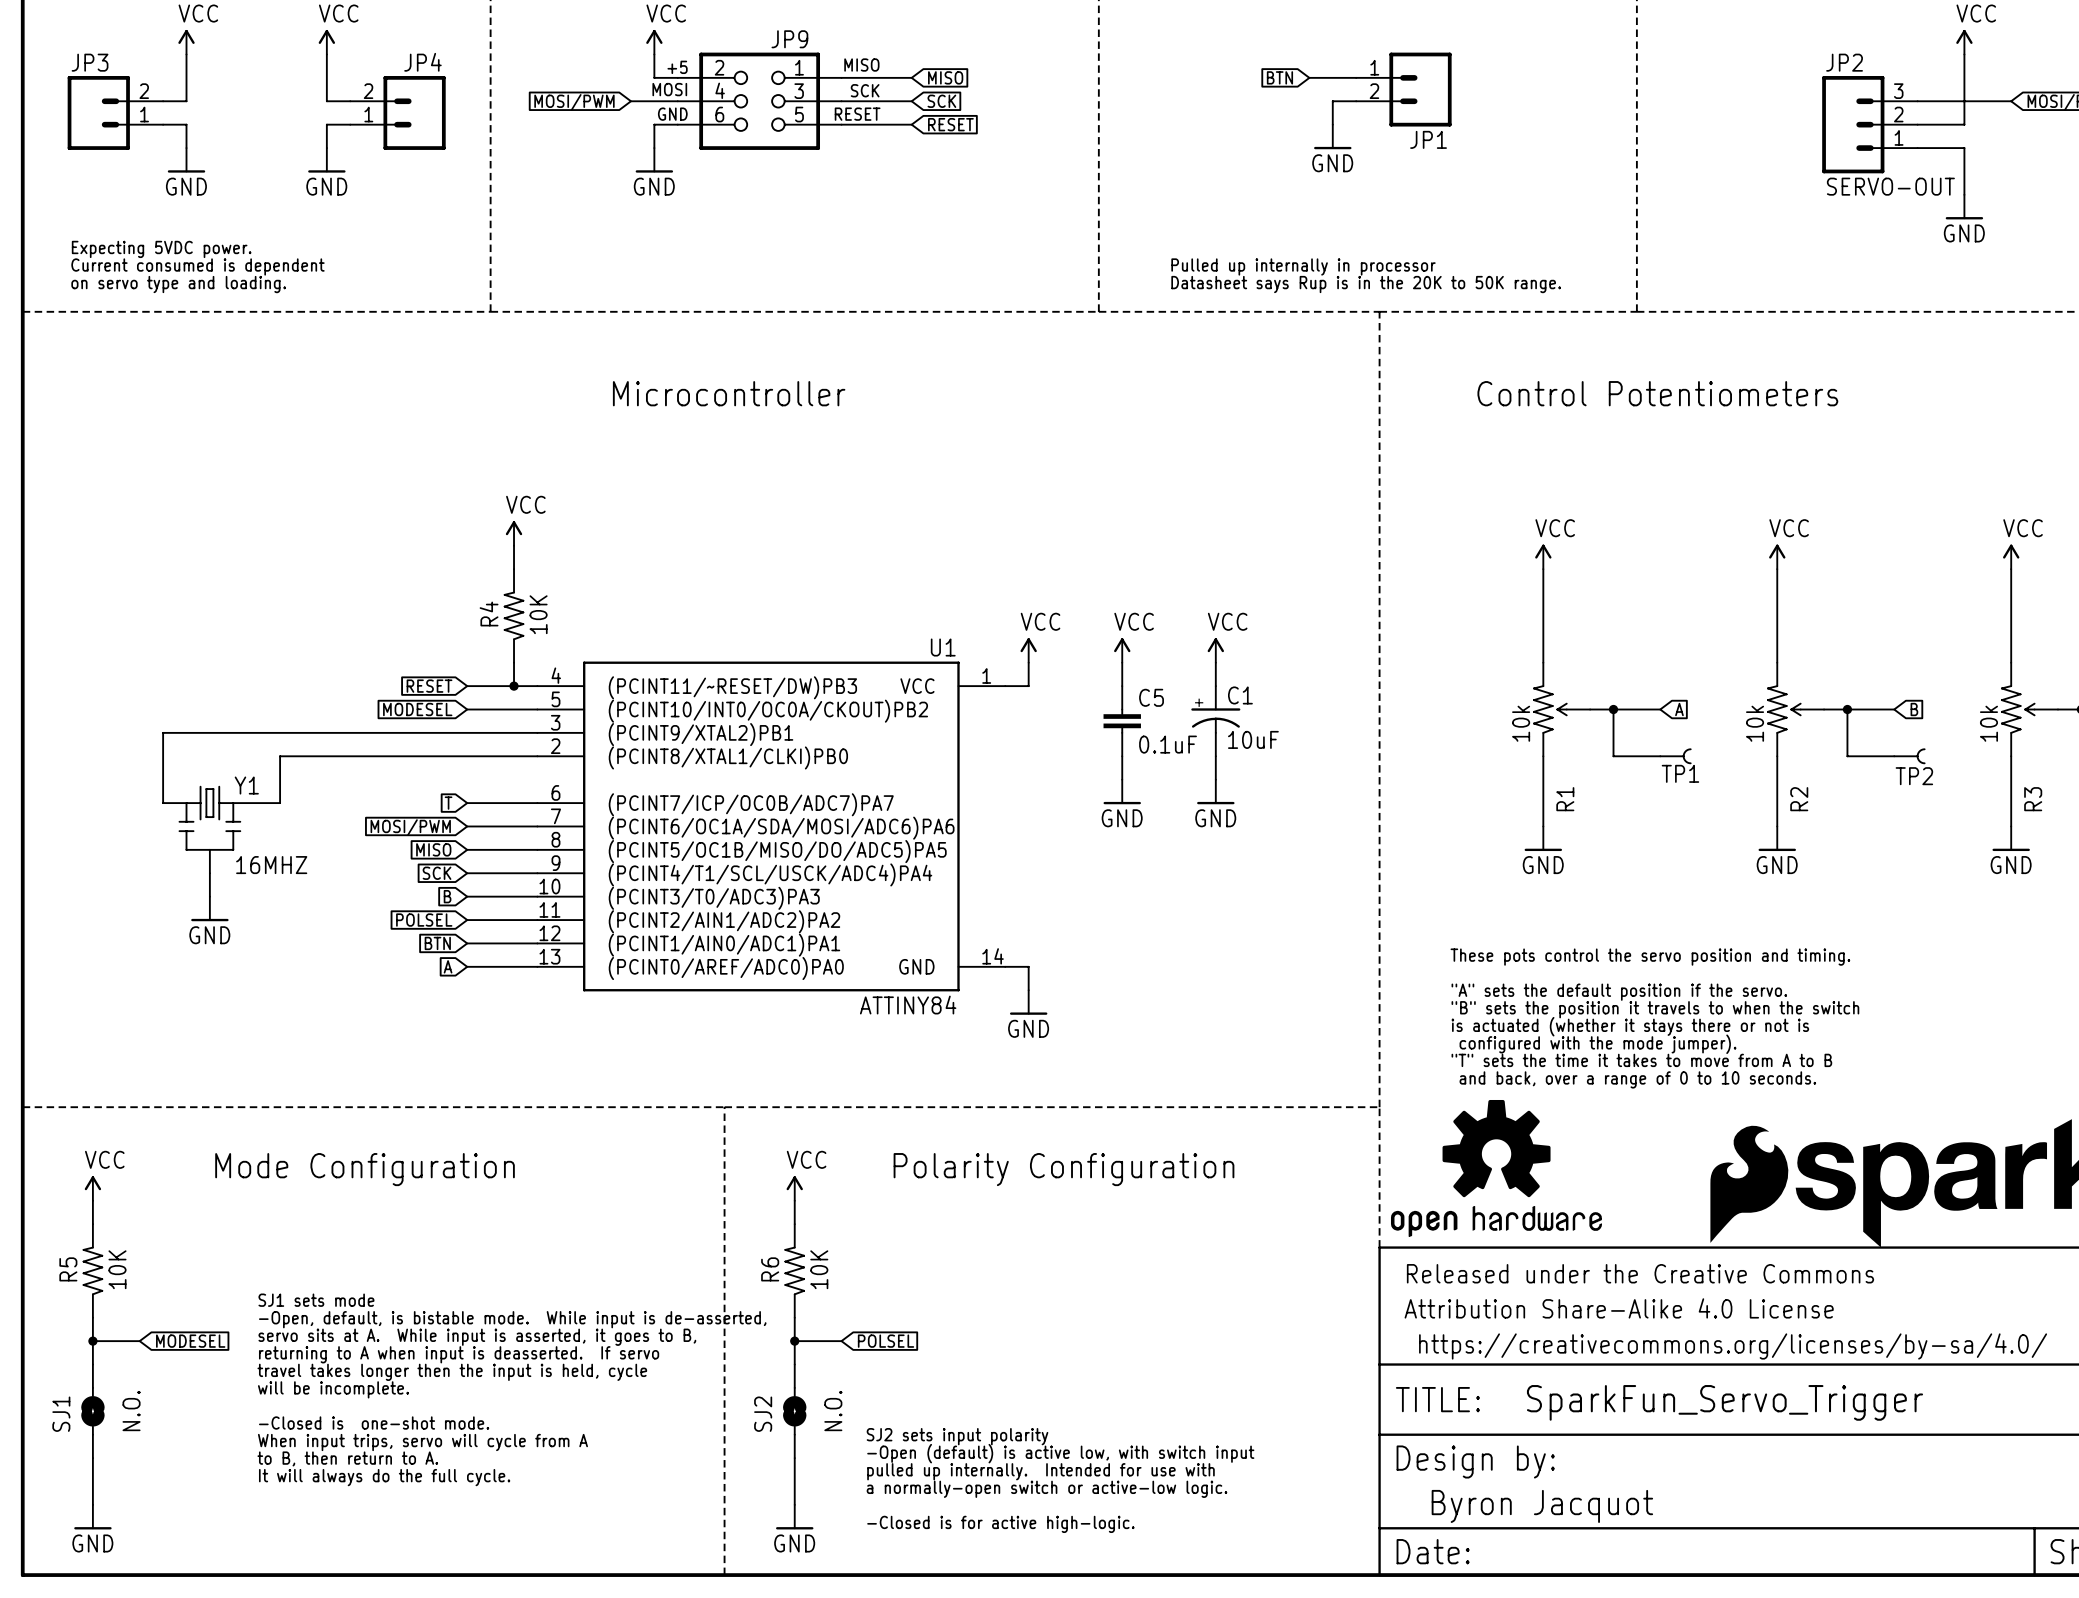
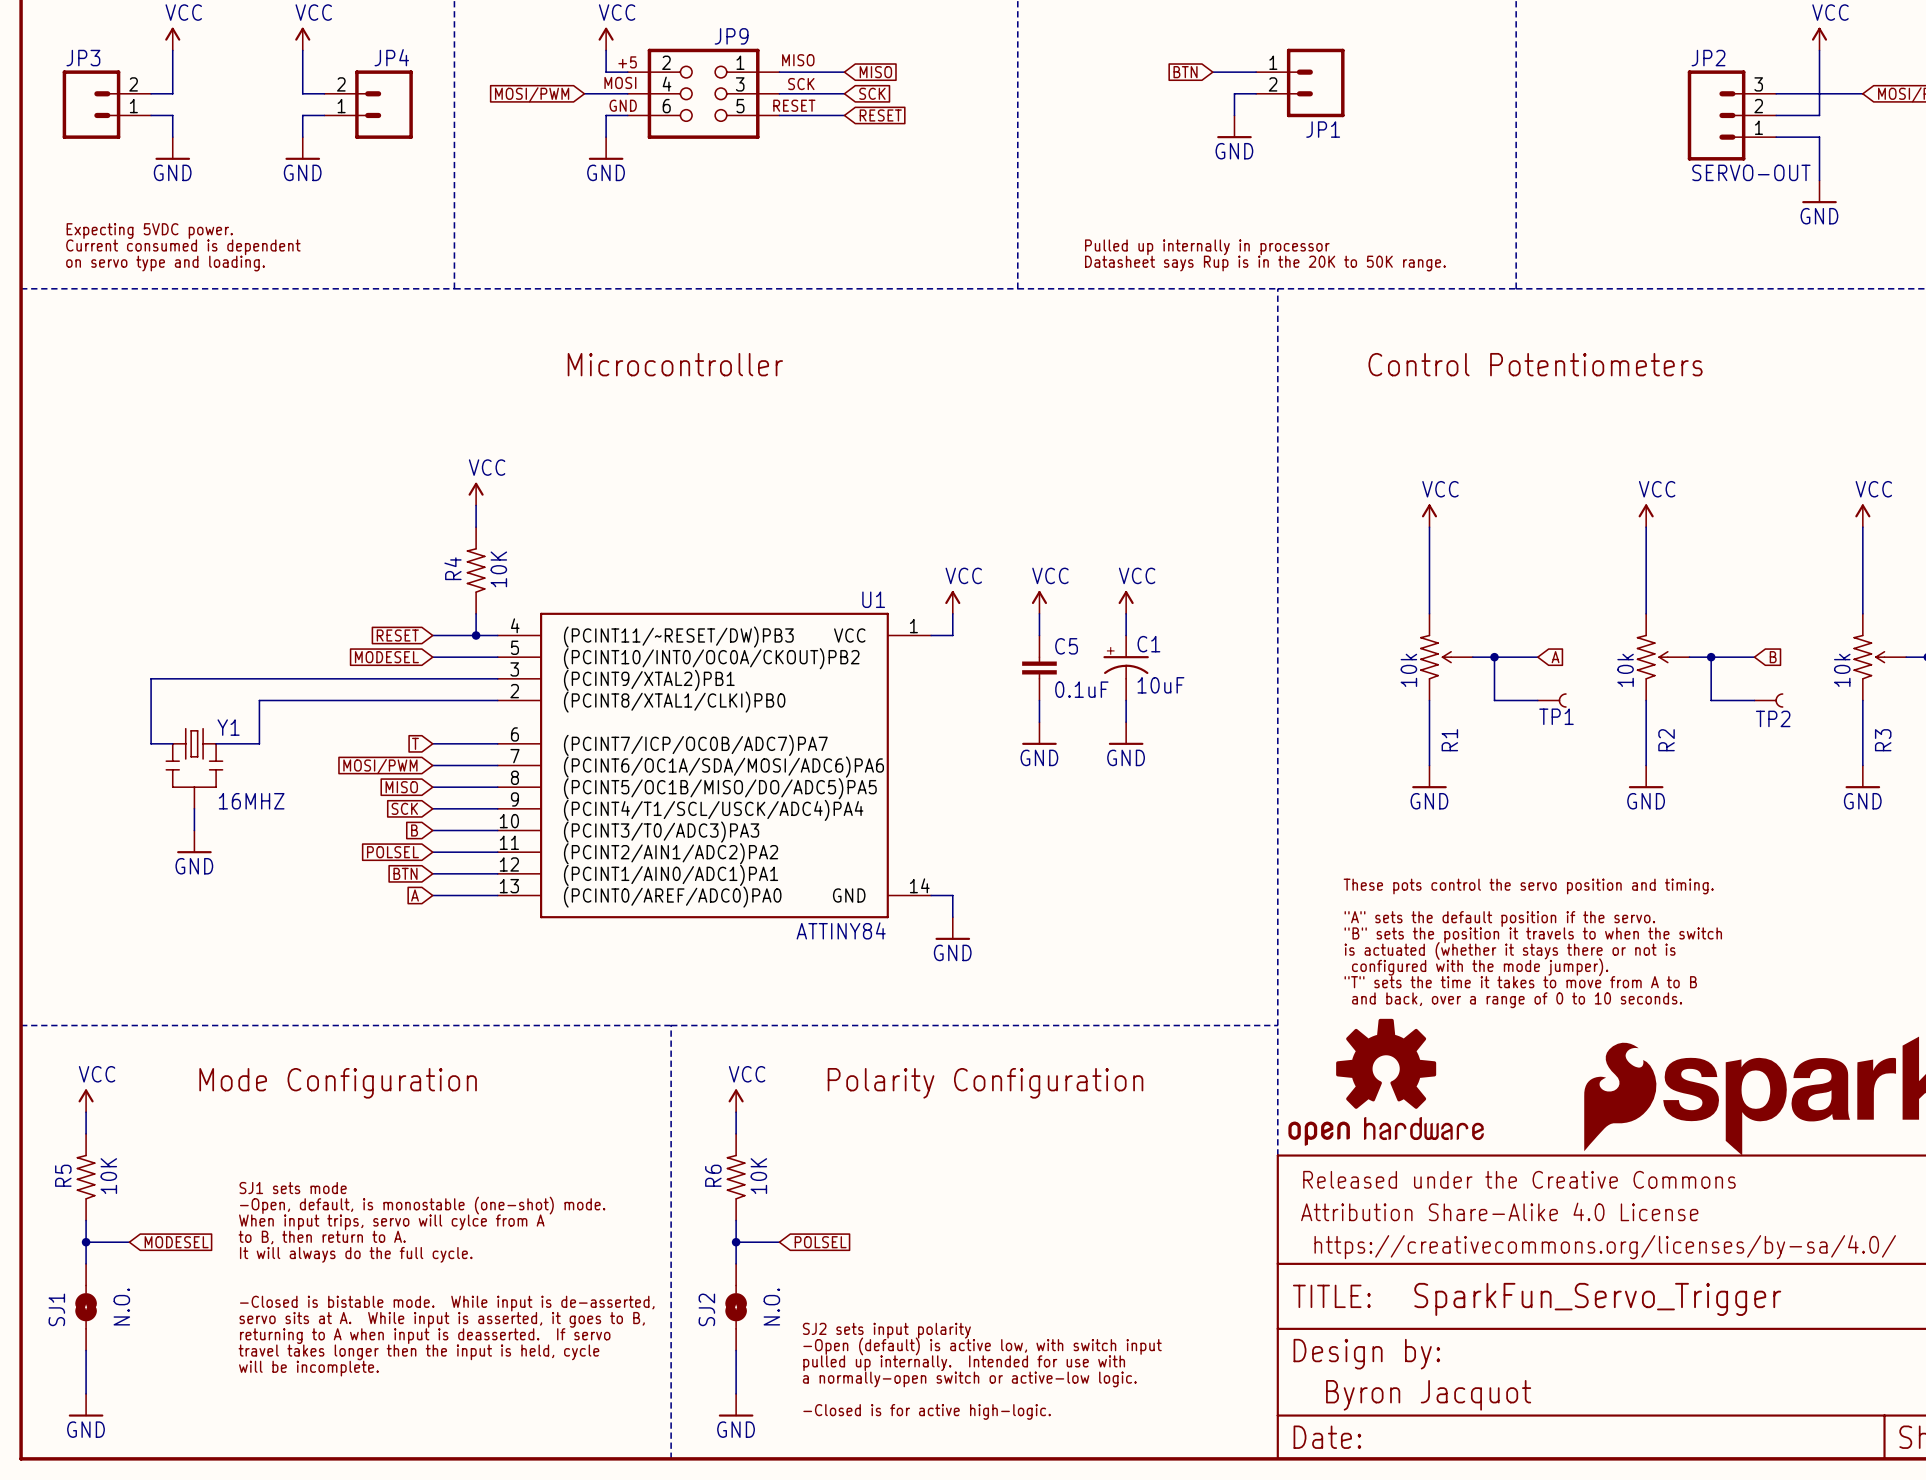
text: none -> SJ1 sets mode (293, 1188)
text: SJ1 sets mode (316, 1300) -> -Open, default, is monostable (one-shot) mode. (422, 1205)
text: -Open, default, is bistable mode. While input is de-asserted, (512, 1319) -> When input trips, servo will cylce from A (391, 1222)
text: servo sits at A. While input is asserted, it goes to B, (477, 1337) -> to B, then return to A. (322, 1237)
text: returning to A when input is deasserted. If servo (459, 1354) -> It will always do the full cycle. (356, 1254)
text: travel takes longer then the input is held, cycle (452, 1372) -> none
text: will be incomplete. (333, 1389) -> none
text: none -> -Closed is bistable mode. While input is de-asserted, (447, 1303)
text: -Closed is one-shot mode. (374, 1423) -> servo sits at A. While input is asserted, it goes to B, (442, 1319)
text: When input trips, servo will cycle from A (422, 1442) -> returning to A when input is deasserted. If servo (425, 1336)
text: to B, then return to A. (347, 1458) -> travel takes longer then the input is held, cycle (418, 1352)
text: It will always do the full cycle. (384, 1477) -> will be incomplete. (308, 1368)

